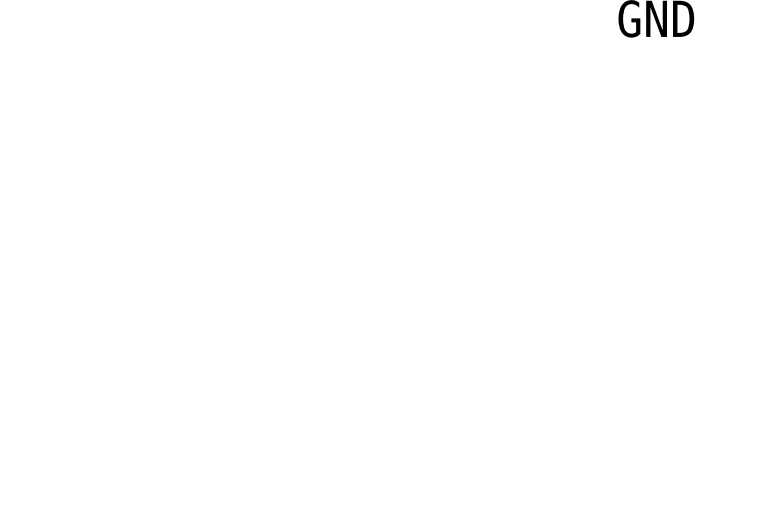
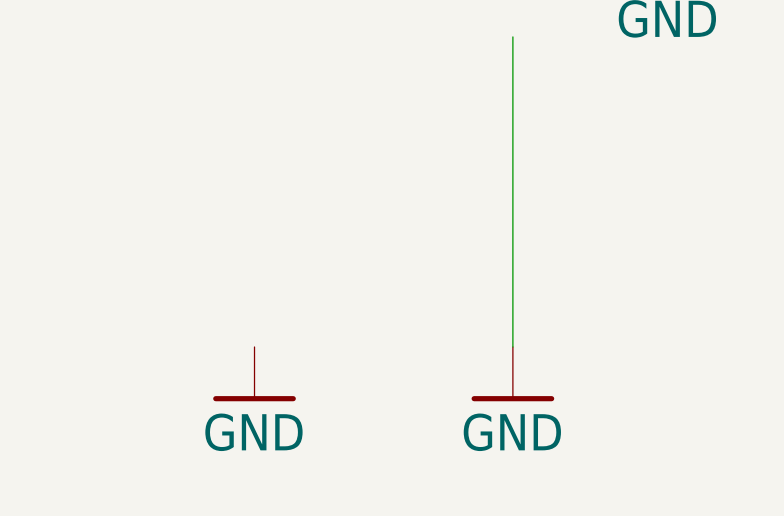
wire: none -> (512, 36) (512, 346)
power symbol: none -> GND (254, 374)
power symbol: none -> GND (512, 374)

